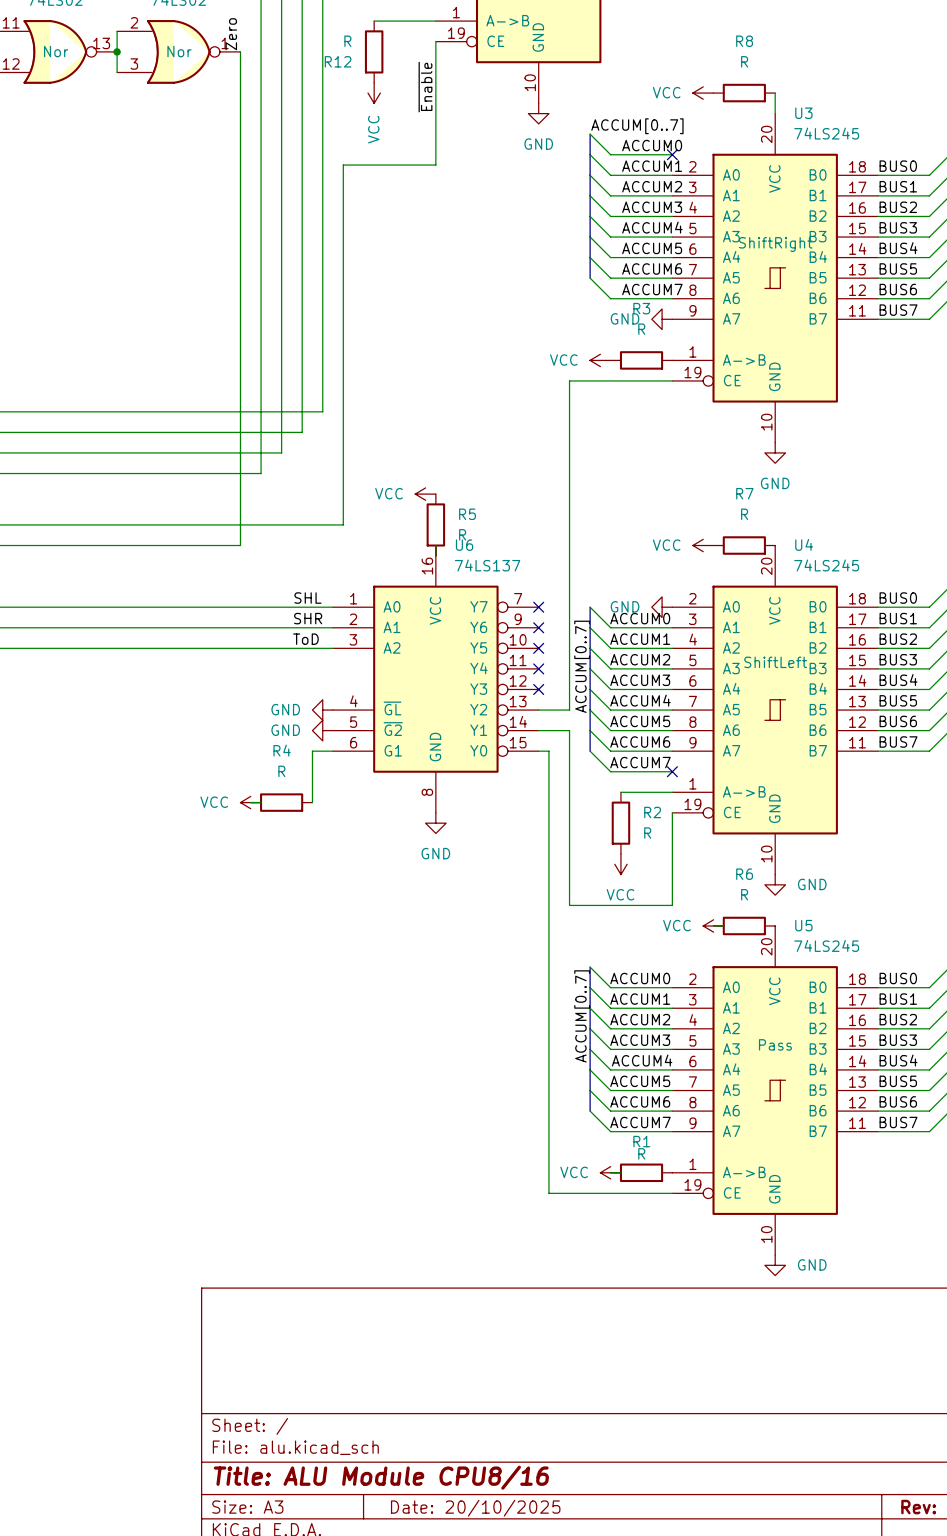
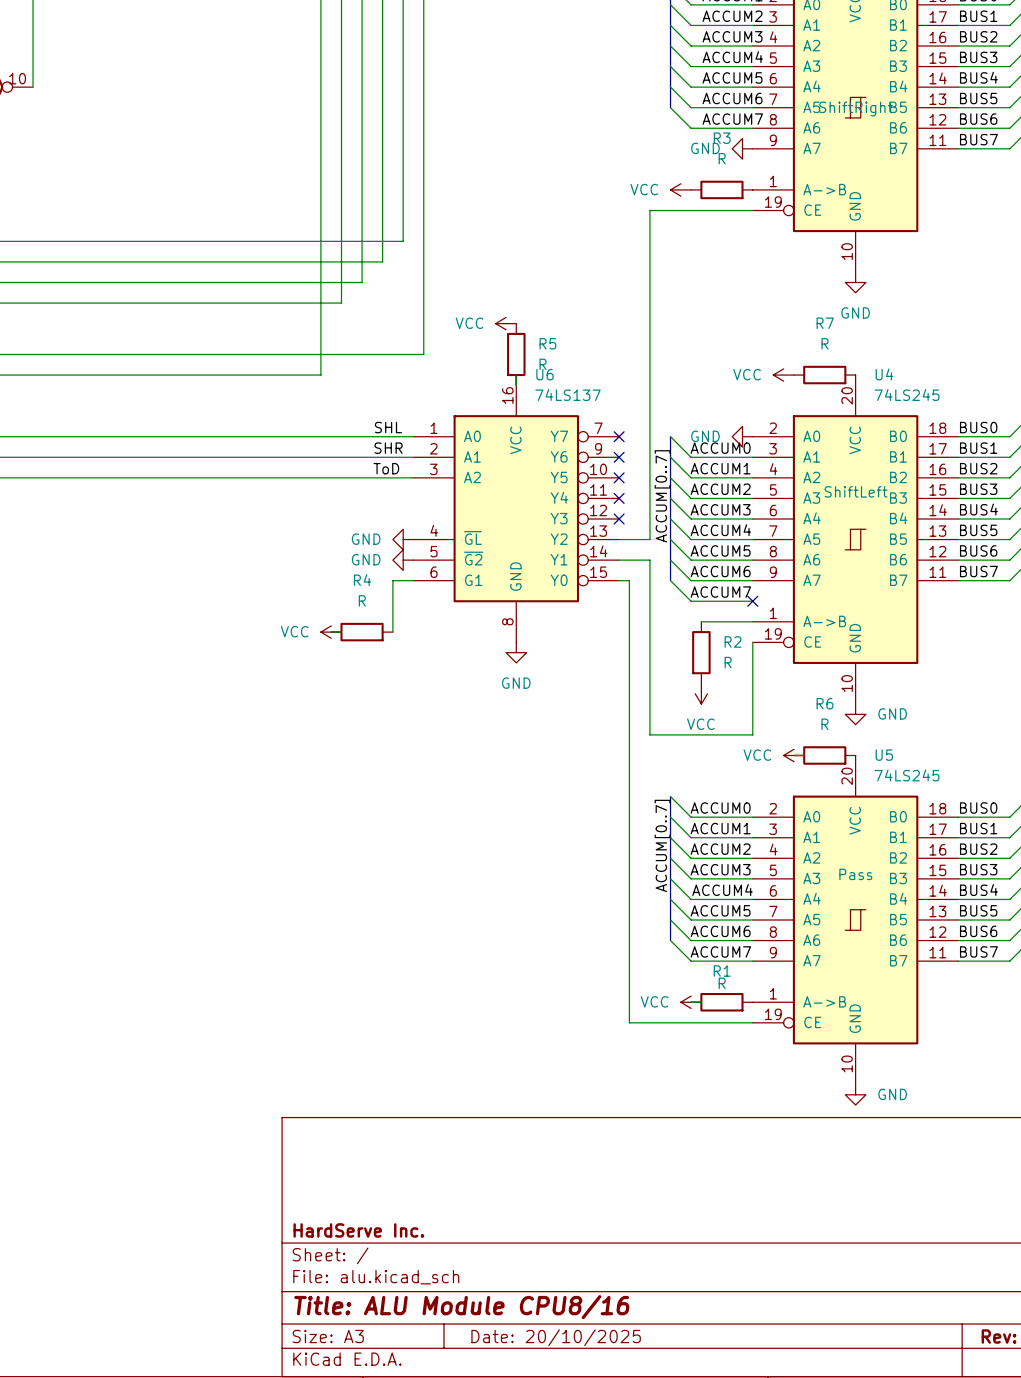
U3 text position: ShiftRight (775, 244) -> ShiftRight (856, 109)
title block: none -> HardServe Inc. (358, 1230)

